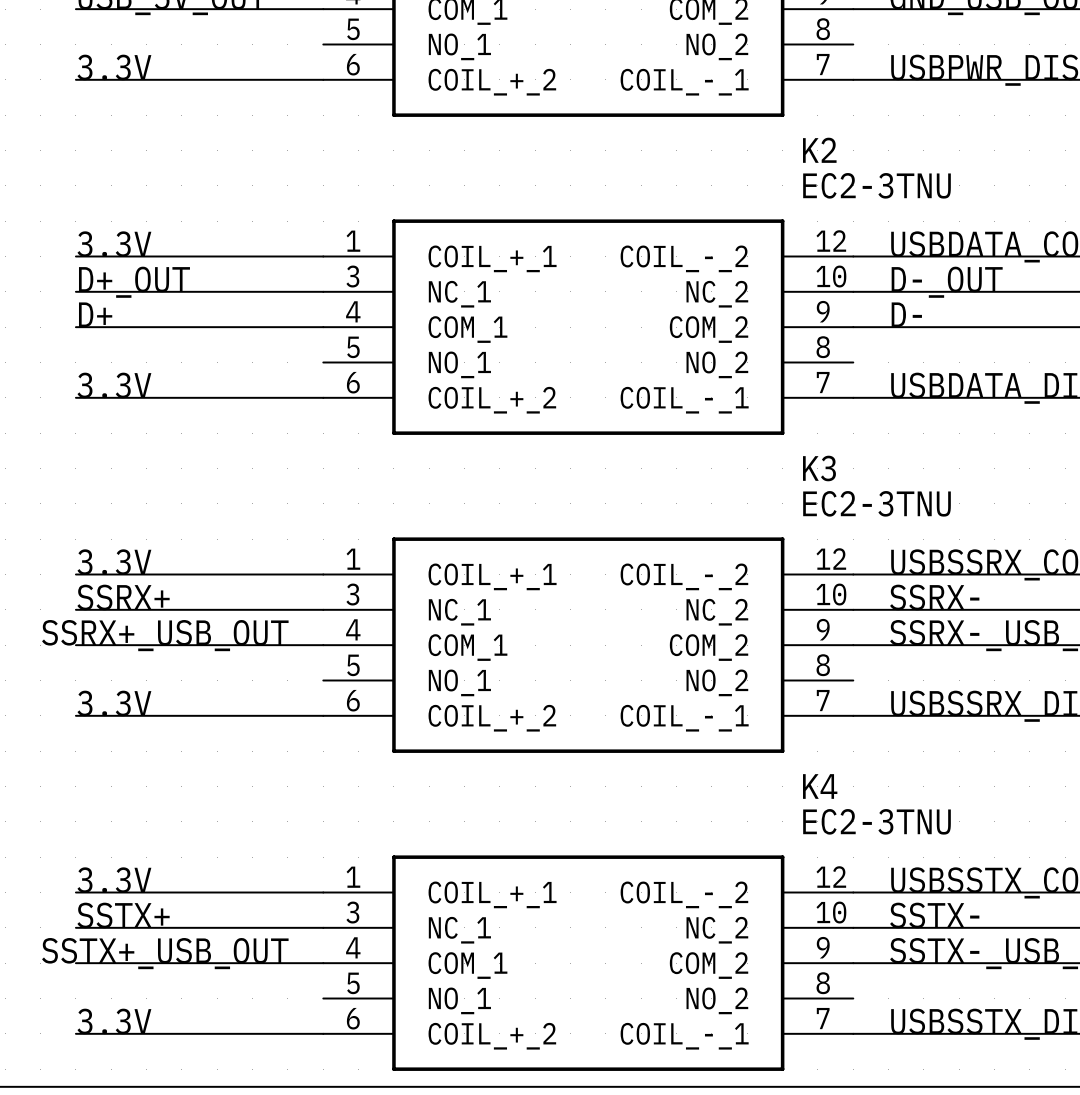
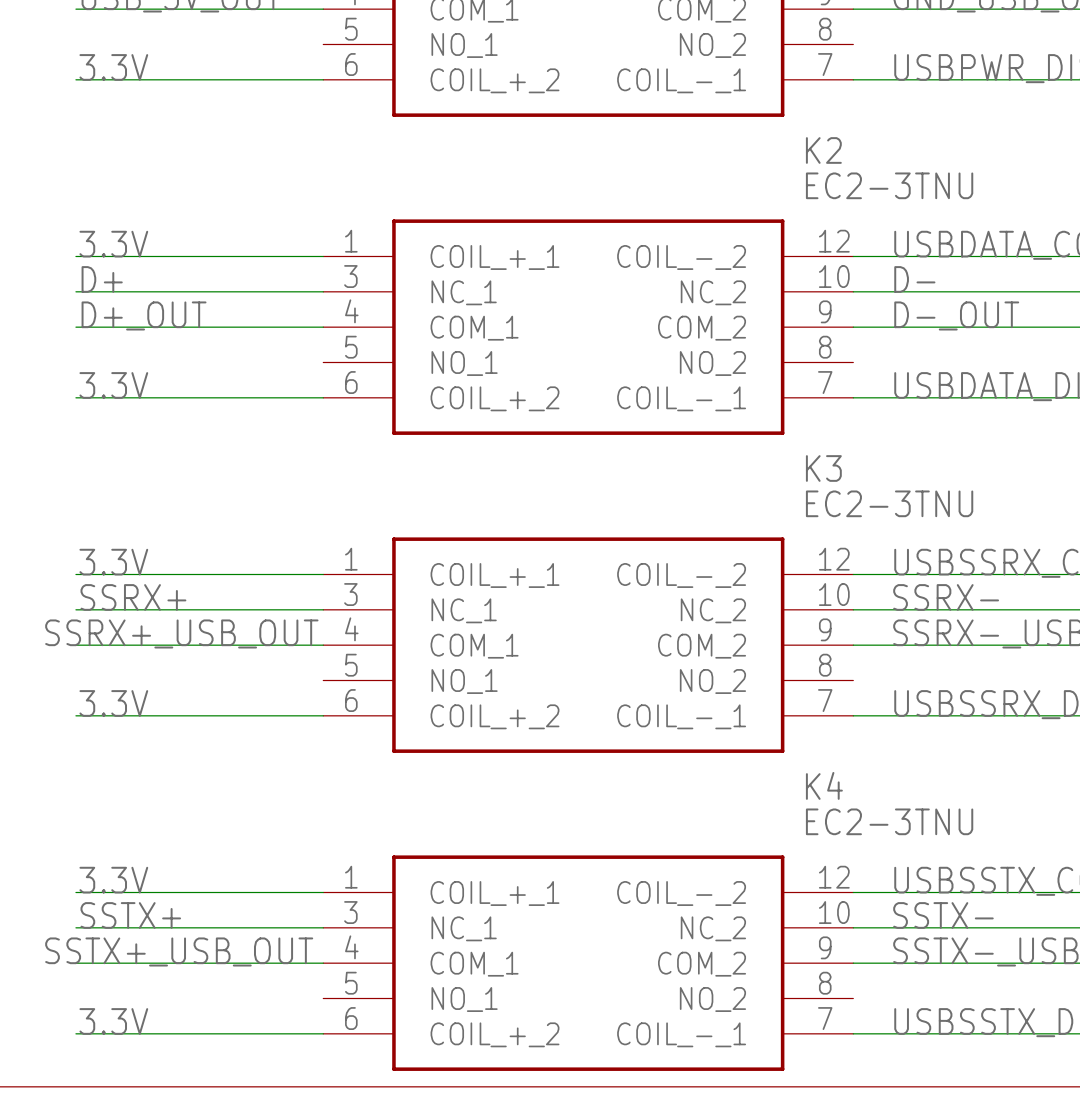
label: D+_OUT (134, 282) -> D+ (102, 279)
label: D-_OUT (947, 282) -> D- (914, 279)
label: D+ (95, 314) -> D+_OUT (144, 315)
label: D- (906, 314) -> D-_OUT (956, 315)

